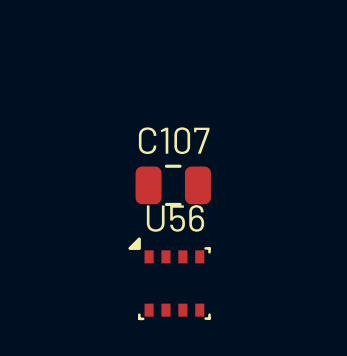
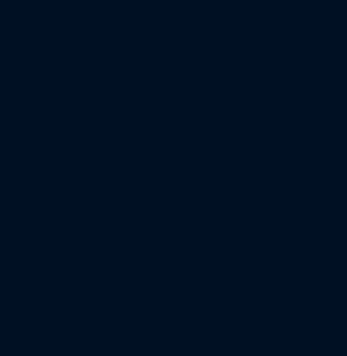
C107: (173, 185) -> none
U56: (169, 278) -> none

